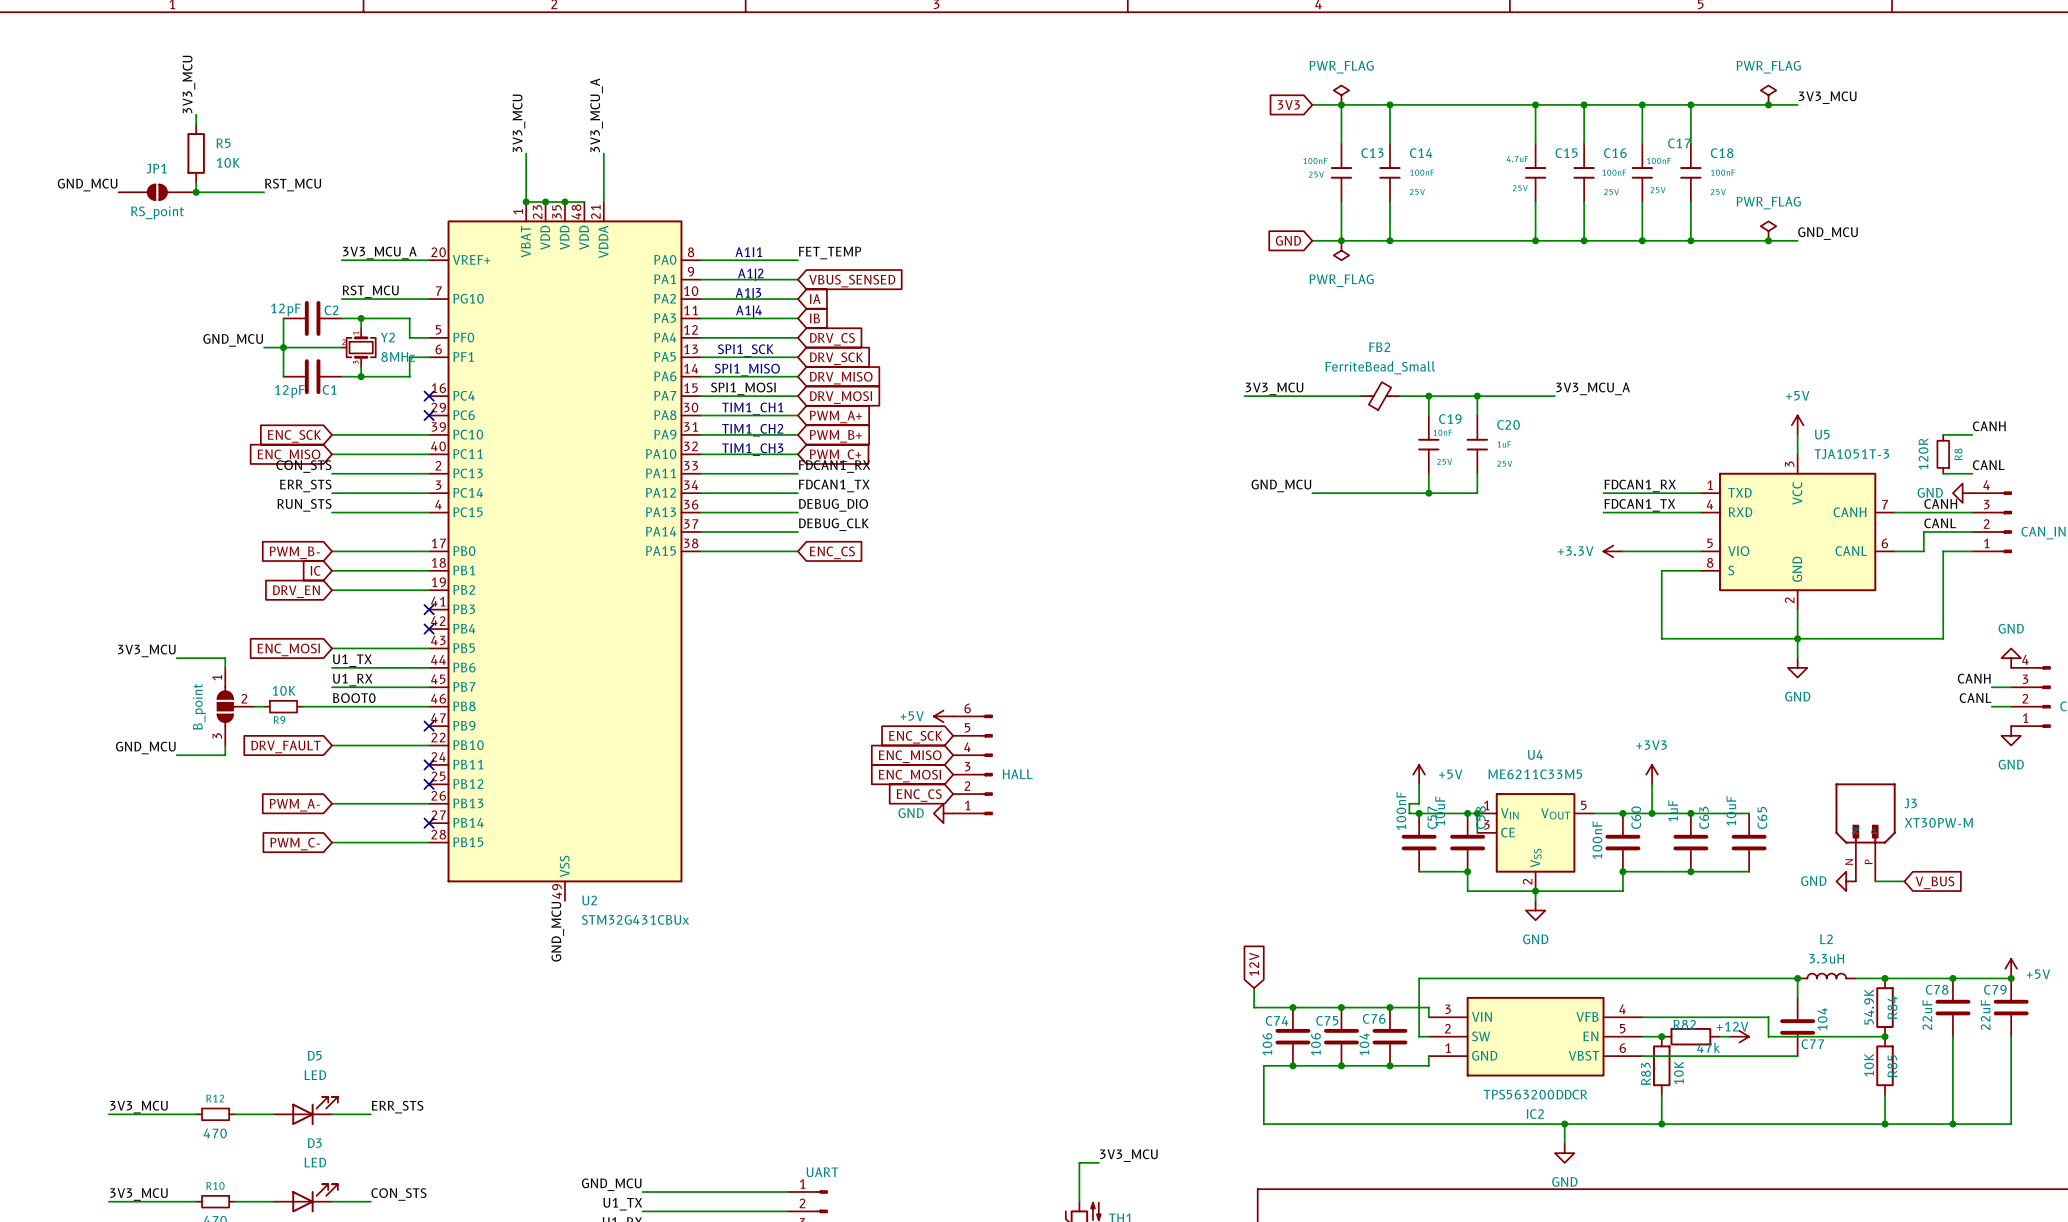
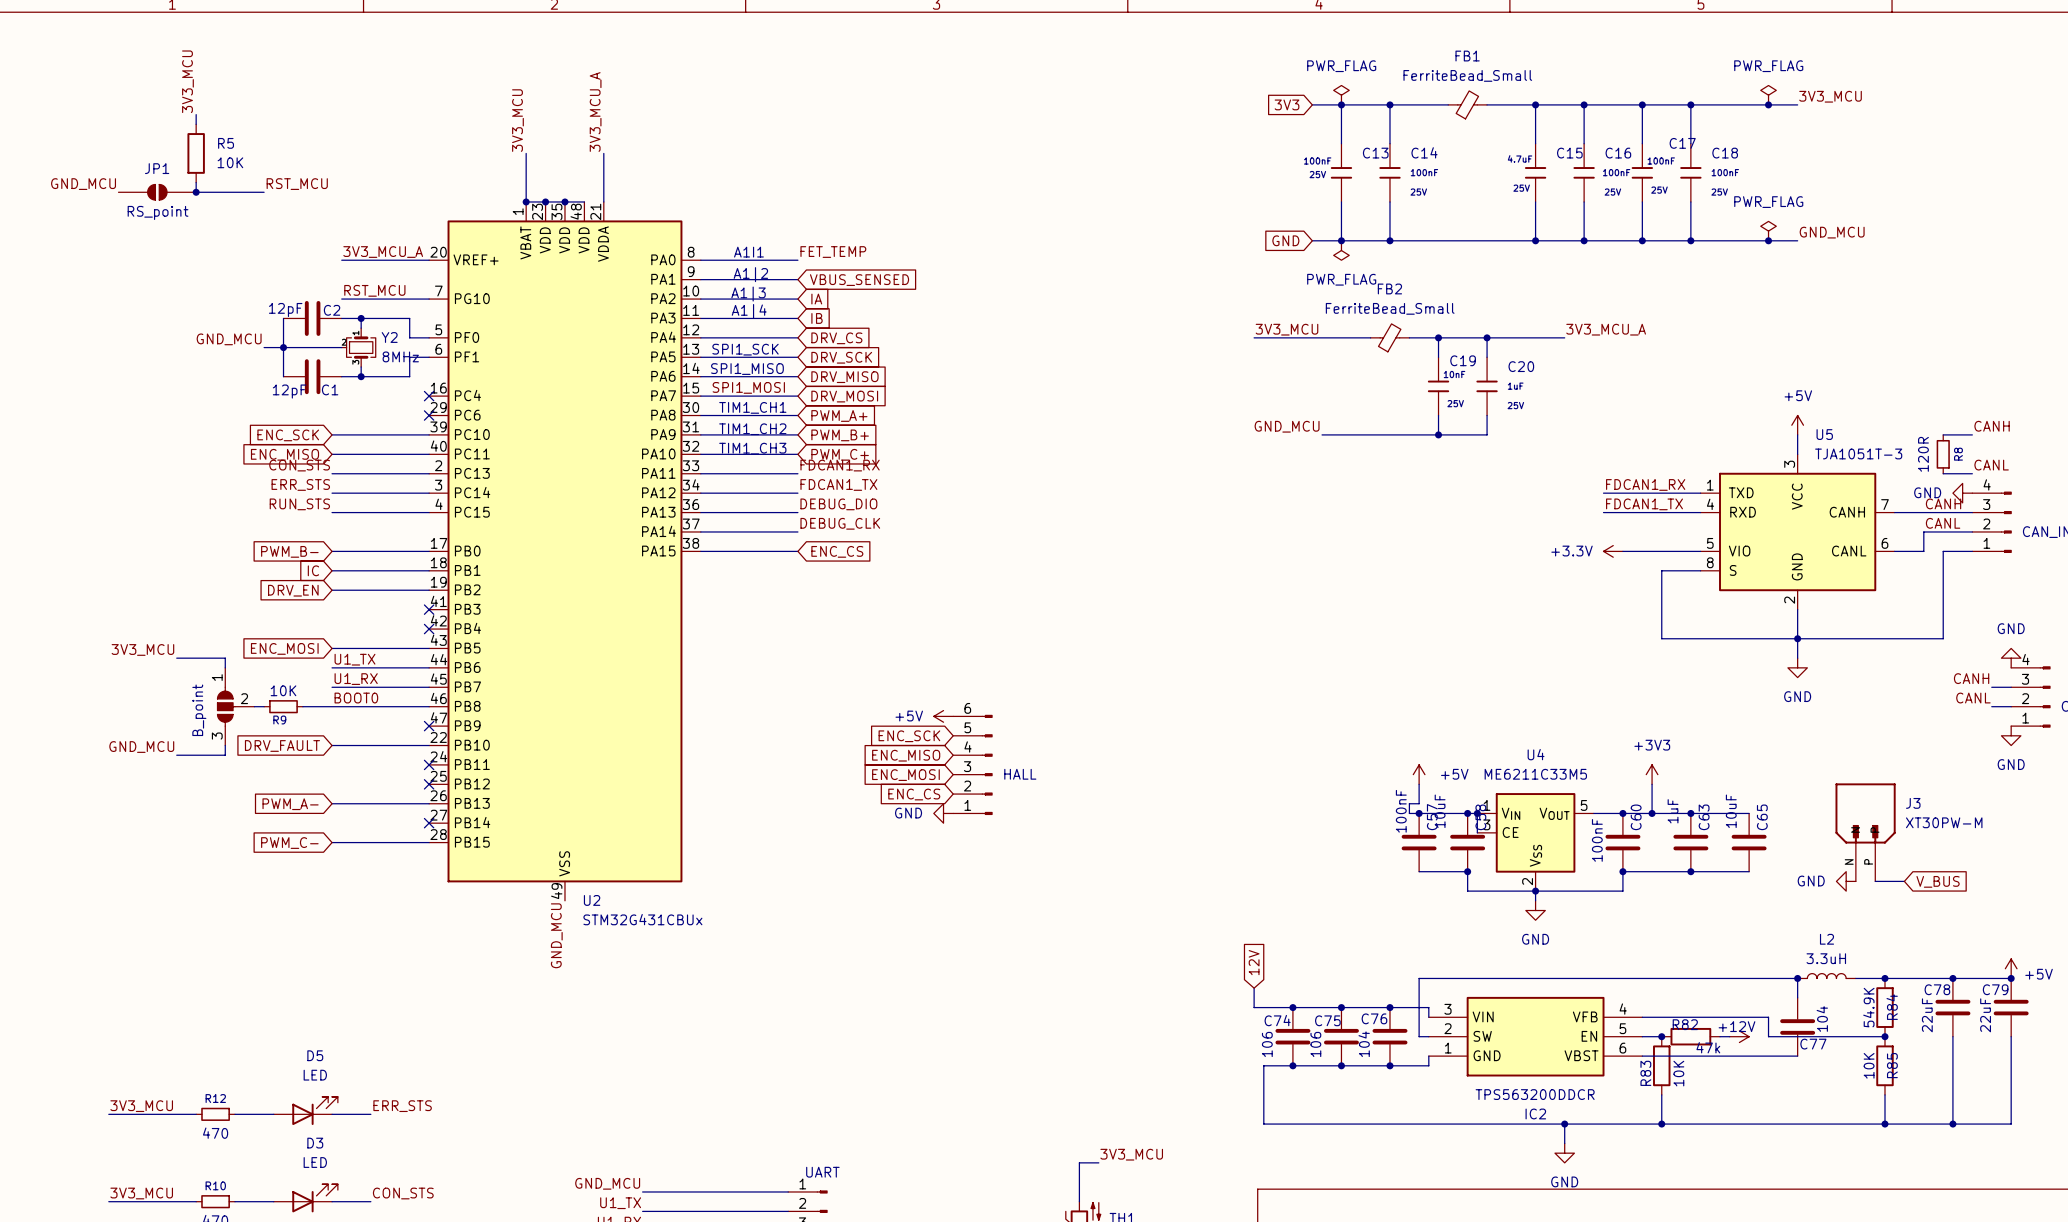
FB1: none -> FerriteBead_Small (1467, 104)
junction: none -> (1438, 337)
junction: none -> (1487, 337)
label position: 3V3_MCU (1274, 388) -> 3V3_MCU (1286, 329)
label position: 3V3_MCU_A (1593, 388) -> 3V3_MCU_A (1606, 329)
wire: (1244, 396) (1360, 396) -> (1254, 337) (1370, 337)
FB2 position: (1380, 396) -> (1389, 337)
wire: (1399, 396) (1554, 396) -> (1409, 337) (1564, 337)
wire: (1428, 396) (1428, 415) -> (1438, 337) (1438, 357)
junction: (1428, 396) -> none
wire: (1477, 396) (1477, 415) -> (1487, 337) (1487, 357)
junction: (1477, 396) -> none
junction: none -> (1438, 434)
C19 position: (1428, 444) -> (1438, 386)
C20 position: (1477, 444) -> (1487, 386)
wire: (1428, 473) (1428, 493) -> (1438, 415) (1438, 434)
wire: (1477, 473) (1477, 493) (1312, 493) -> (1487, 415) (1487, 434) (1322, 434)
label position: GND_MCU (1281, 485) -> GND_MCU (1287, 426)
junction: (1428, 493) -> none

